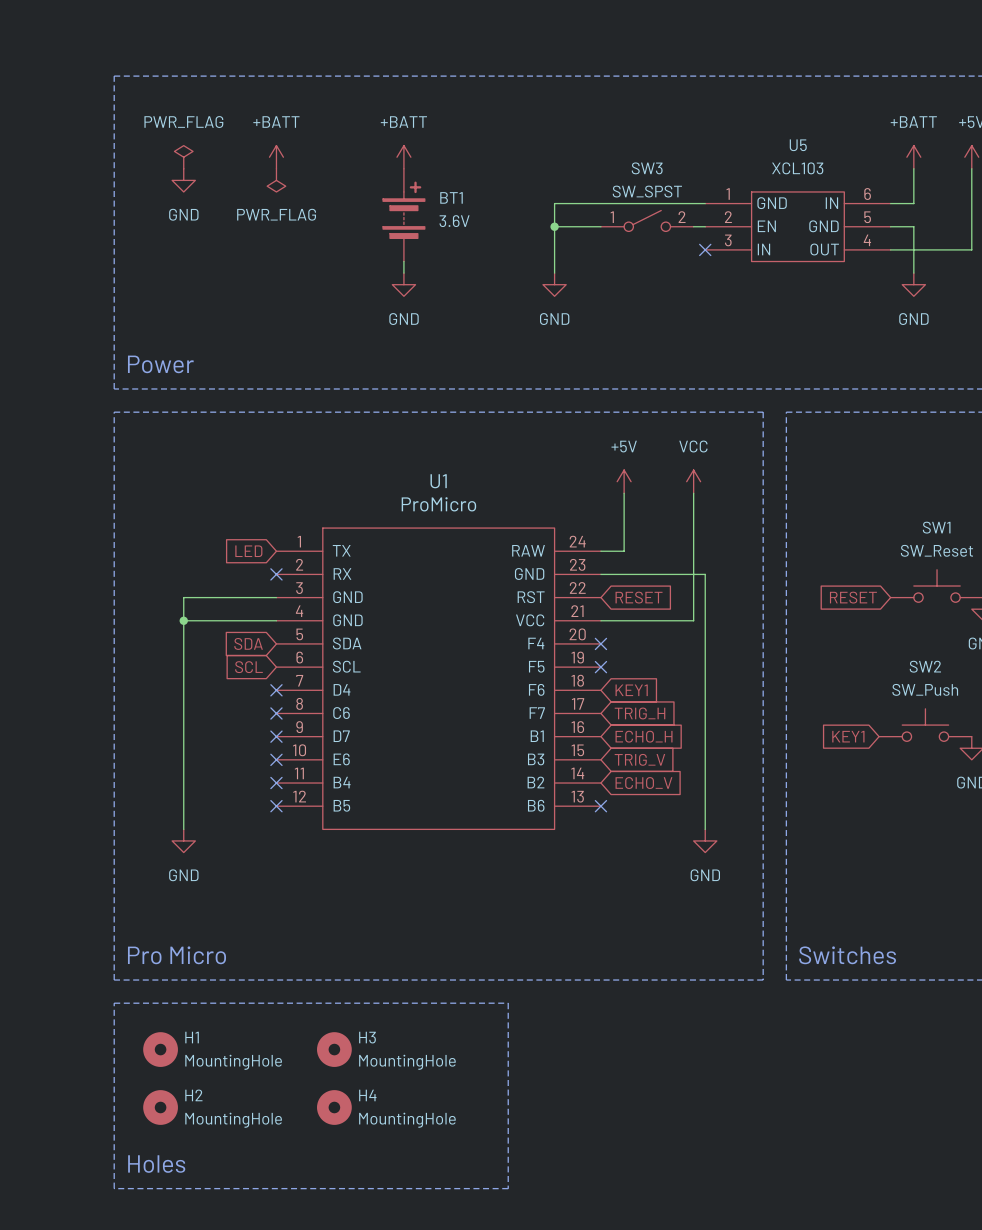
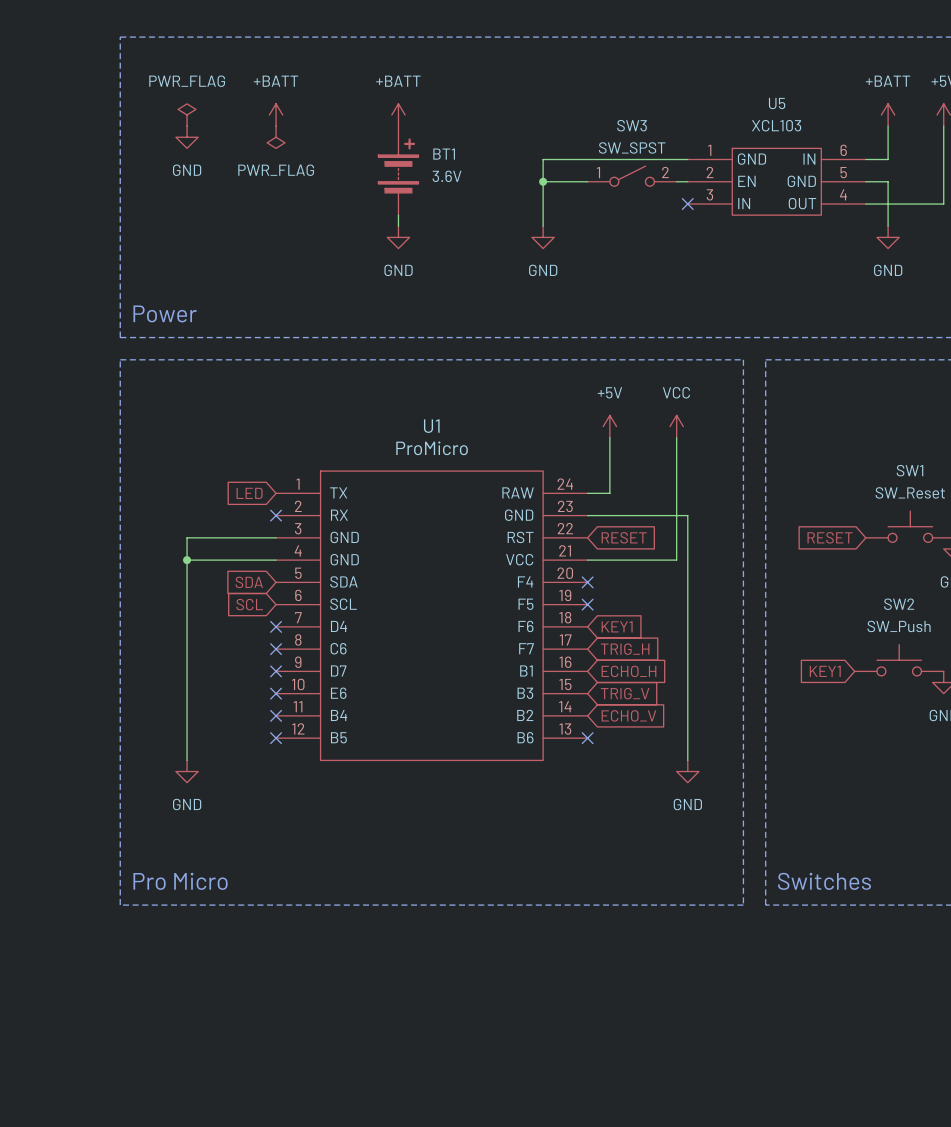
line: (114, 1003) (508, 1003) (508, 1188) (114, 1188) (114, 1003) -> none
H1: MountingHole (160, 1049) -> none
H3: MountingHole (334, 1049) -> none
H2: MountingHole (160, 1107) -> none
H4: MountingHole (334, 1107) -> none
text: Holes (156, 1164) -> none

